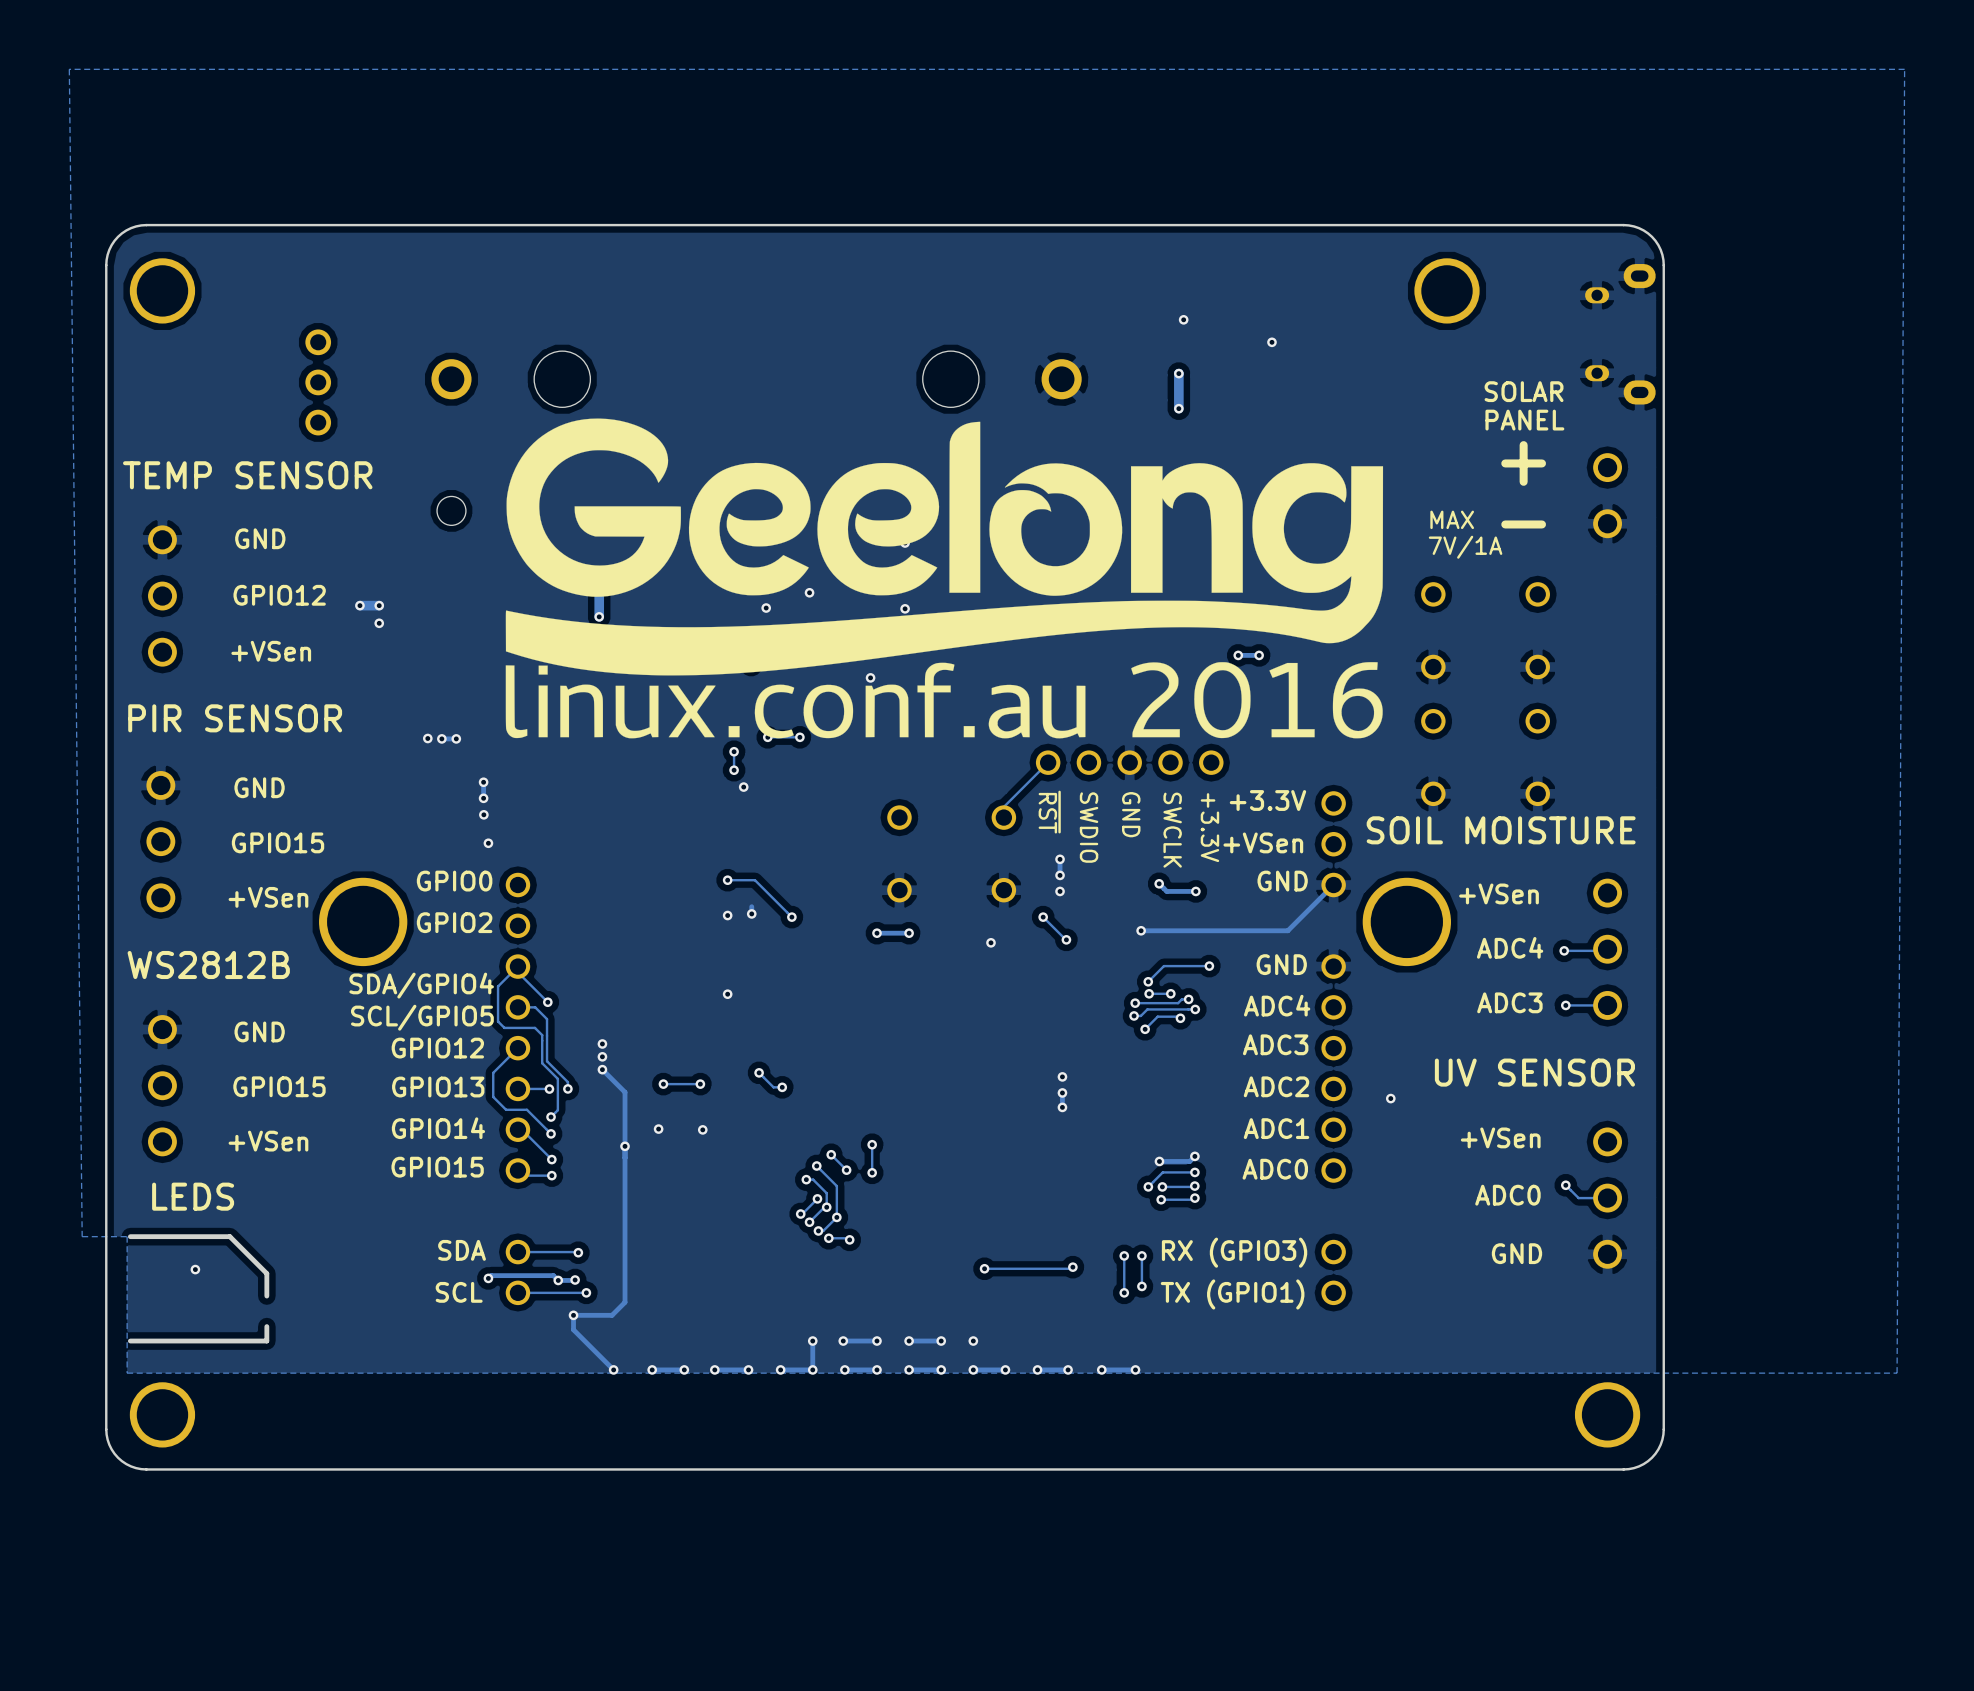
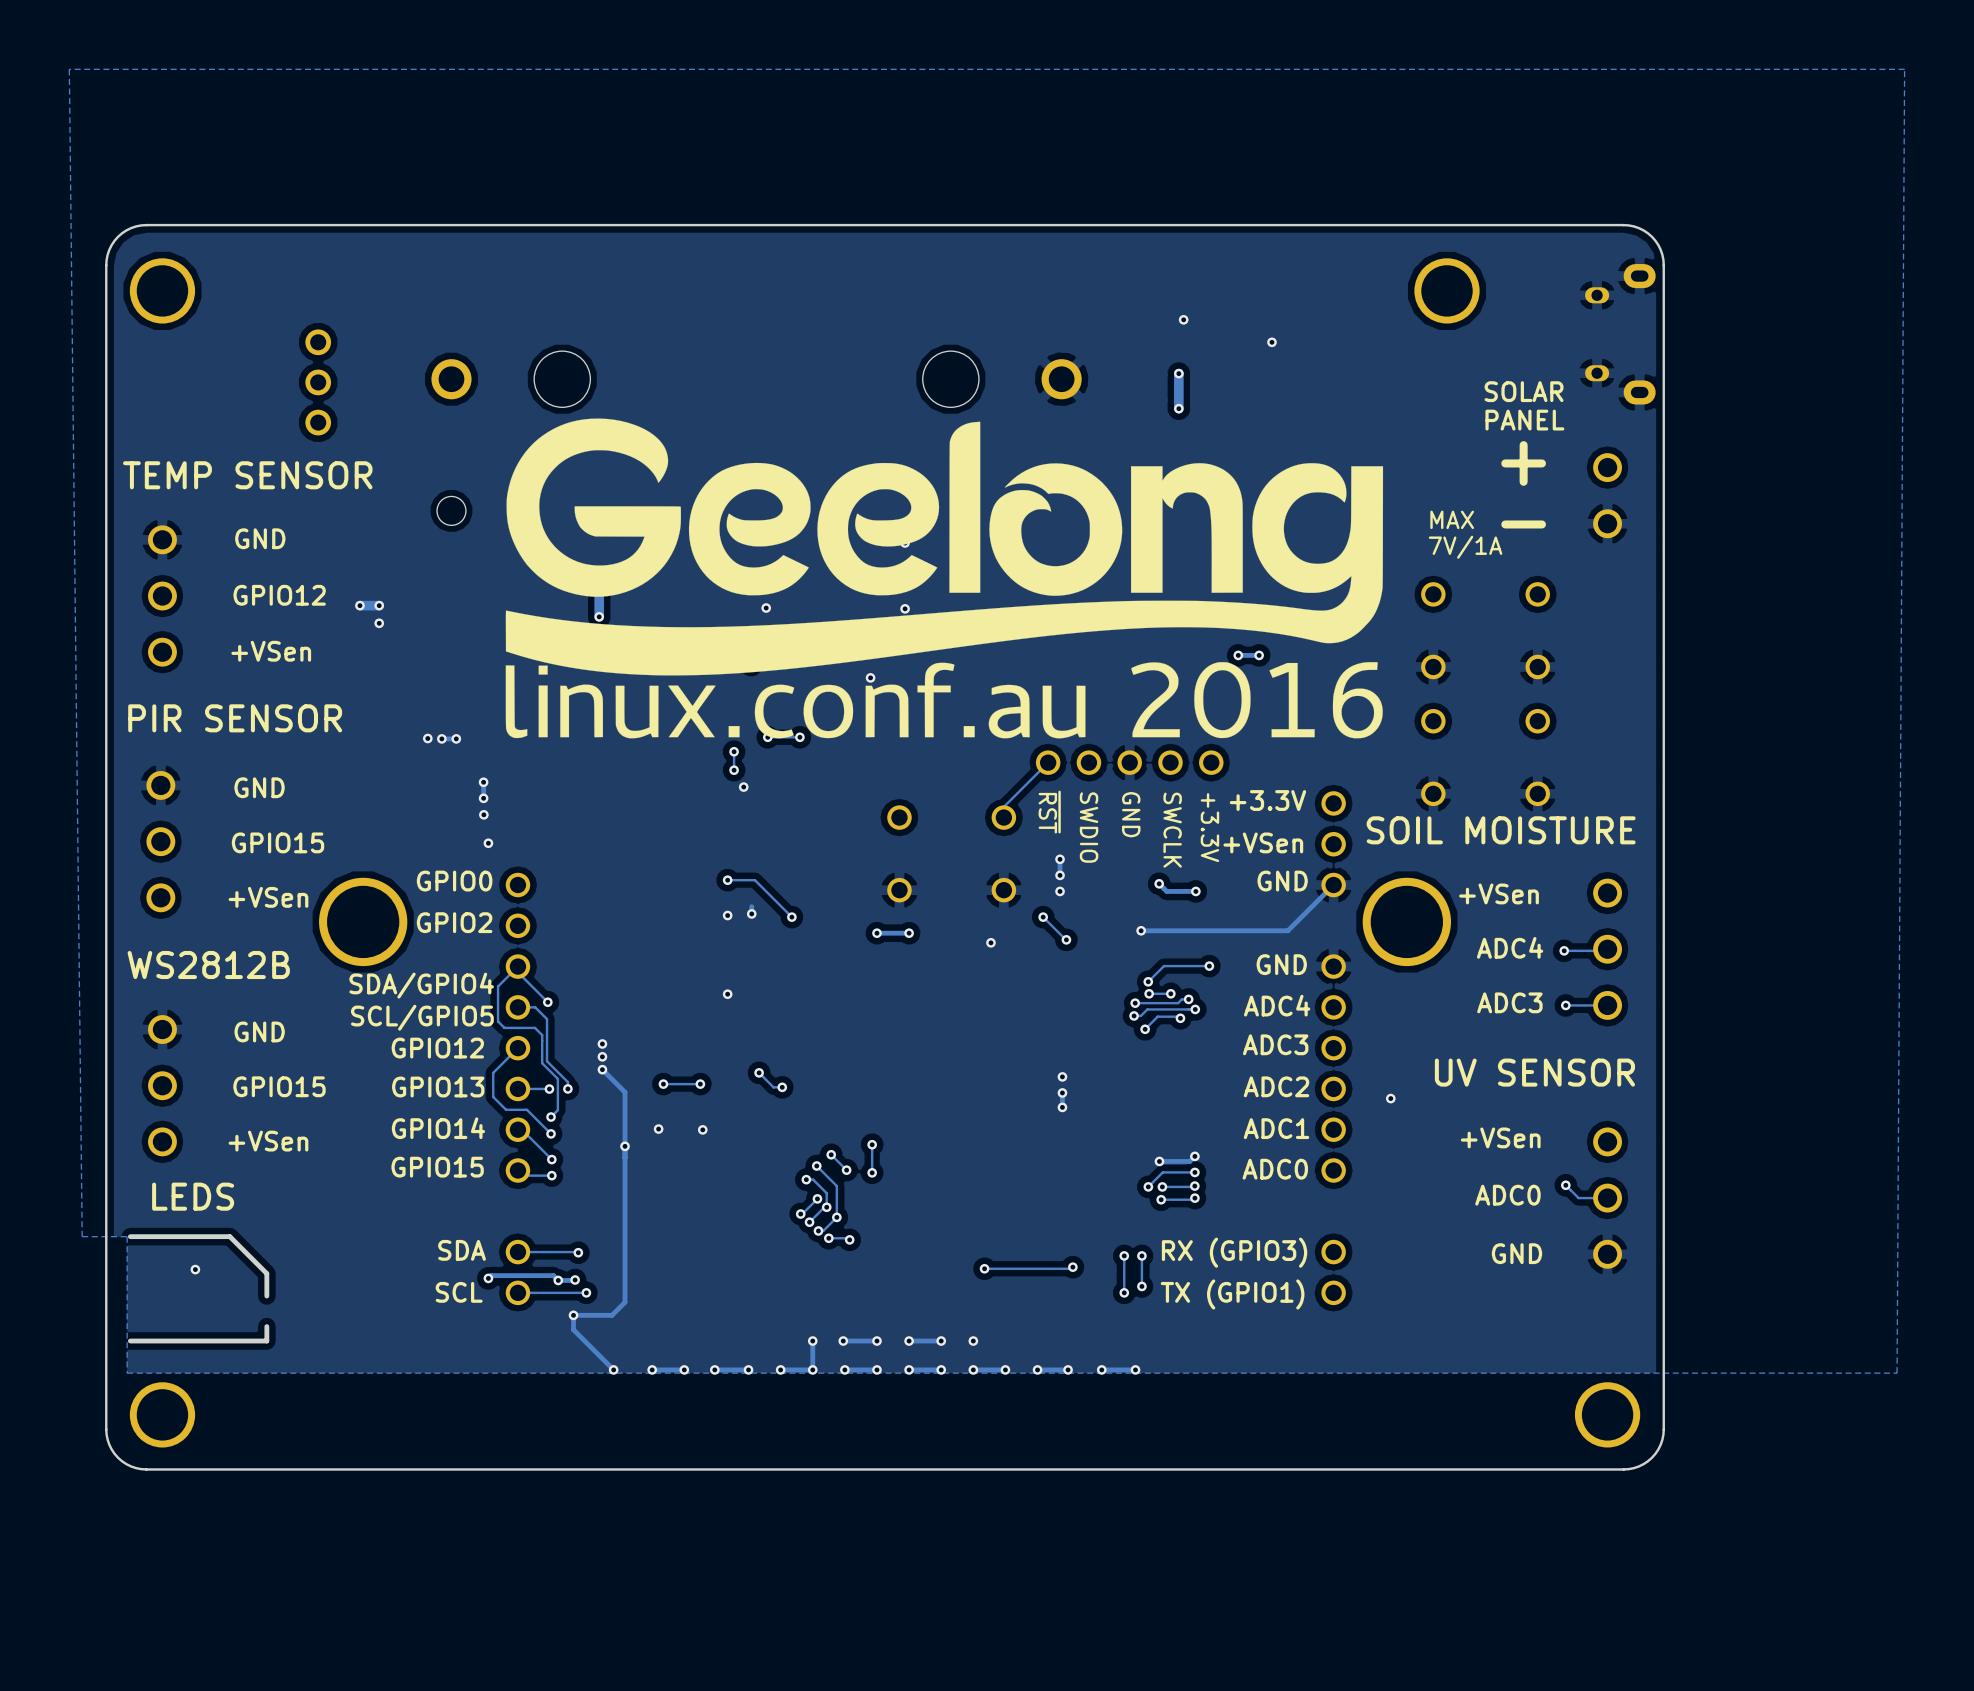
via: (809, 592) -> none

